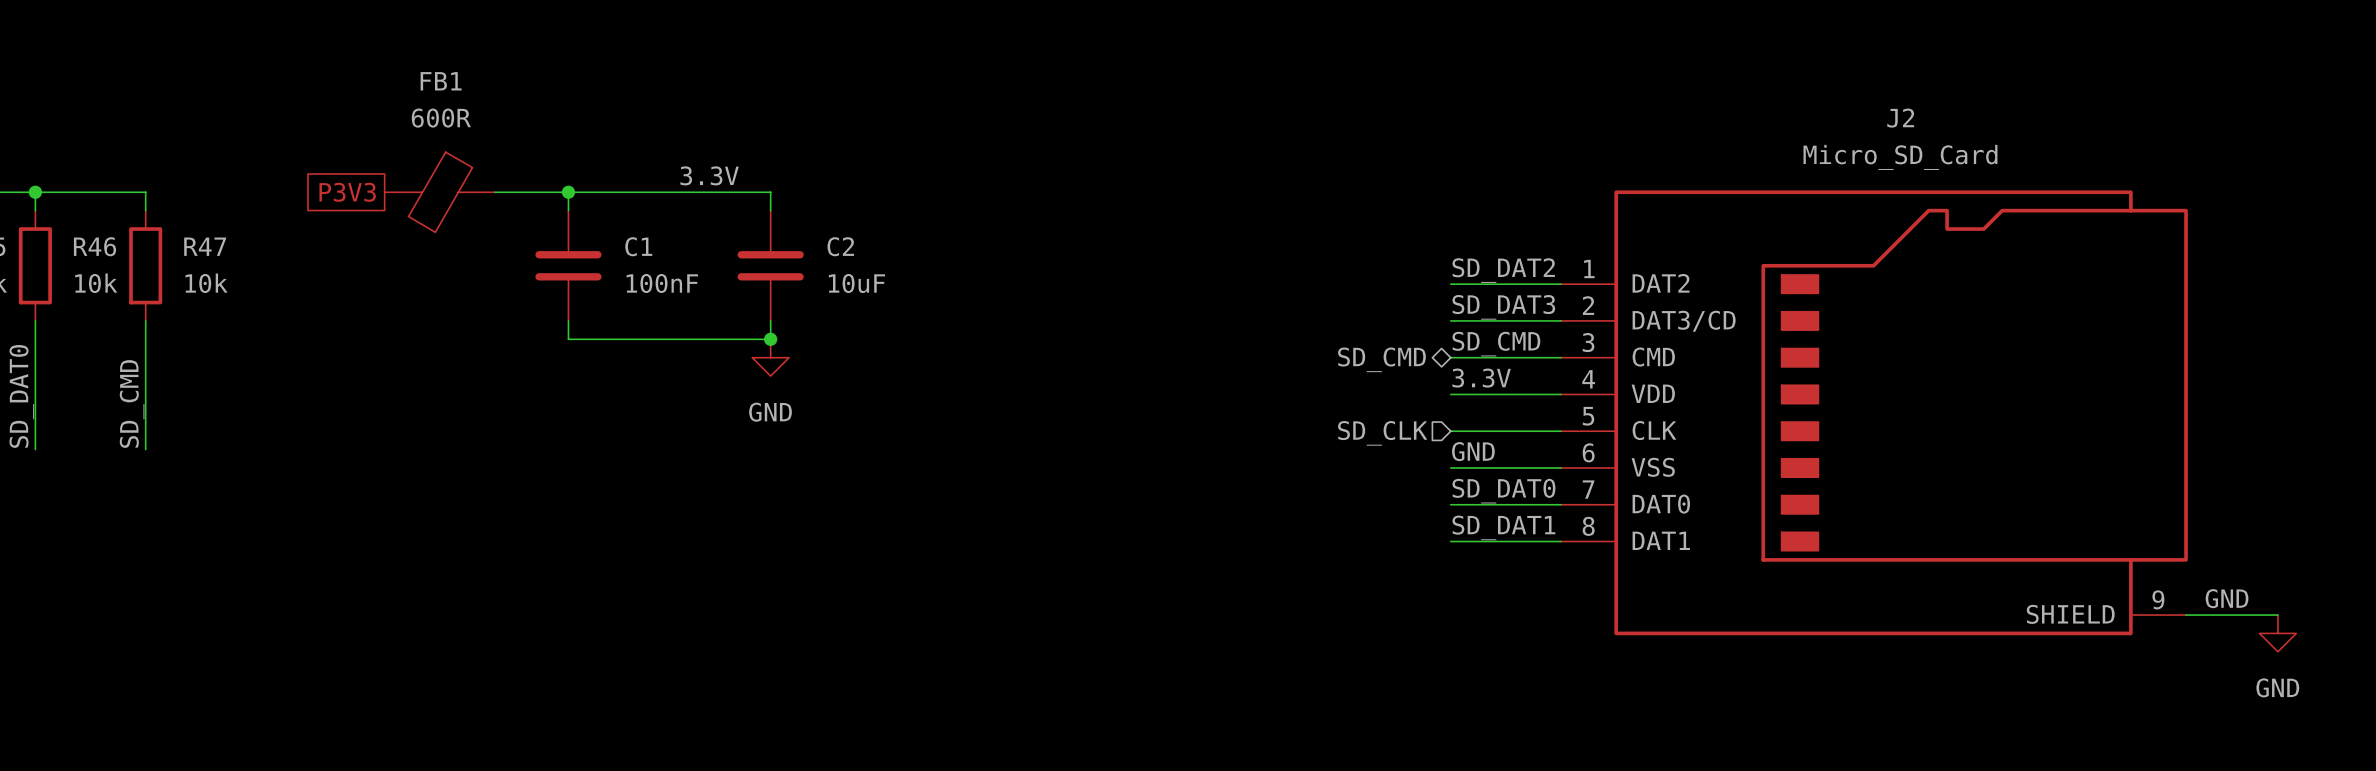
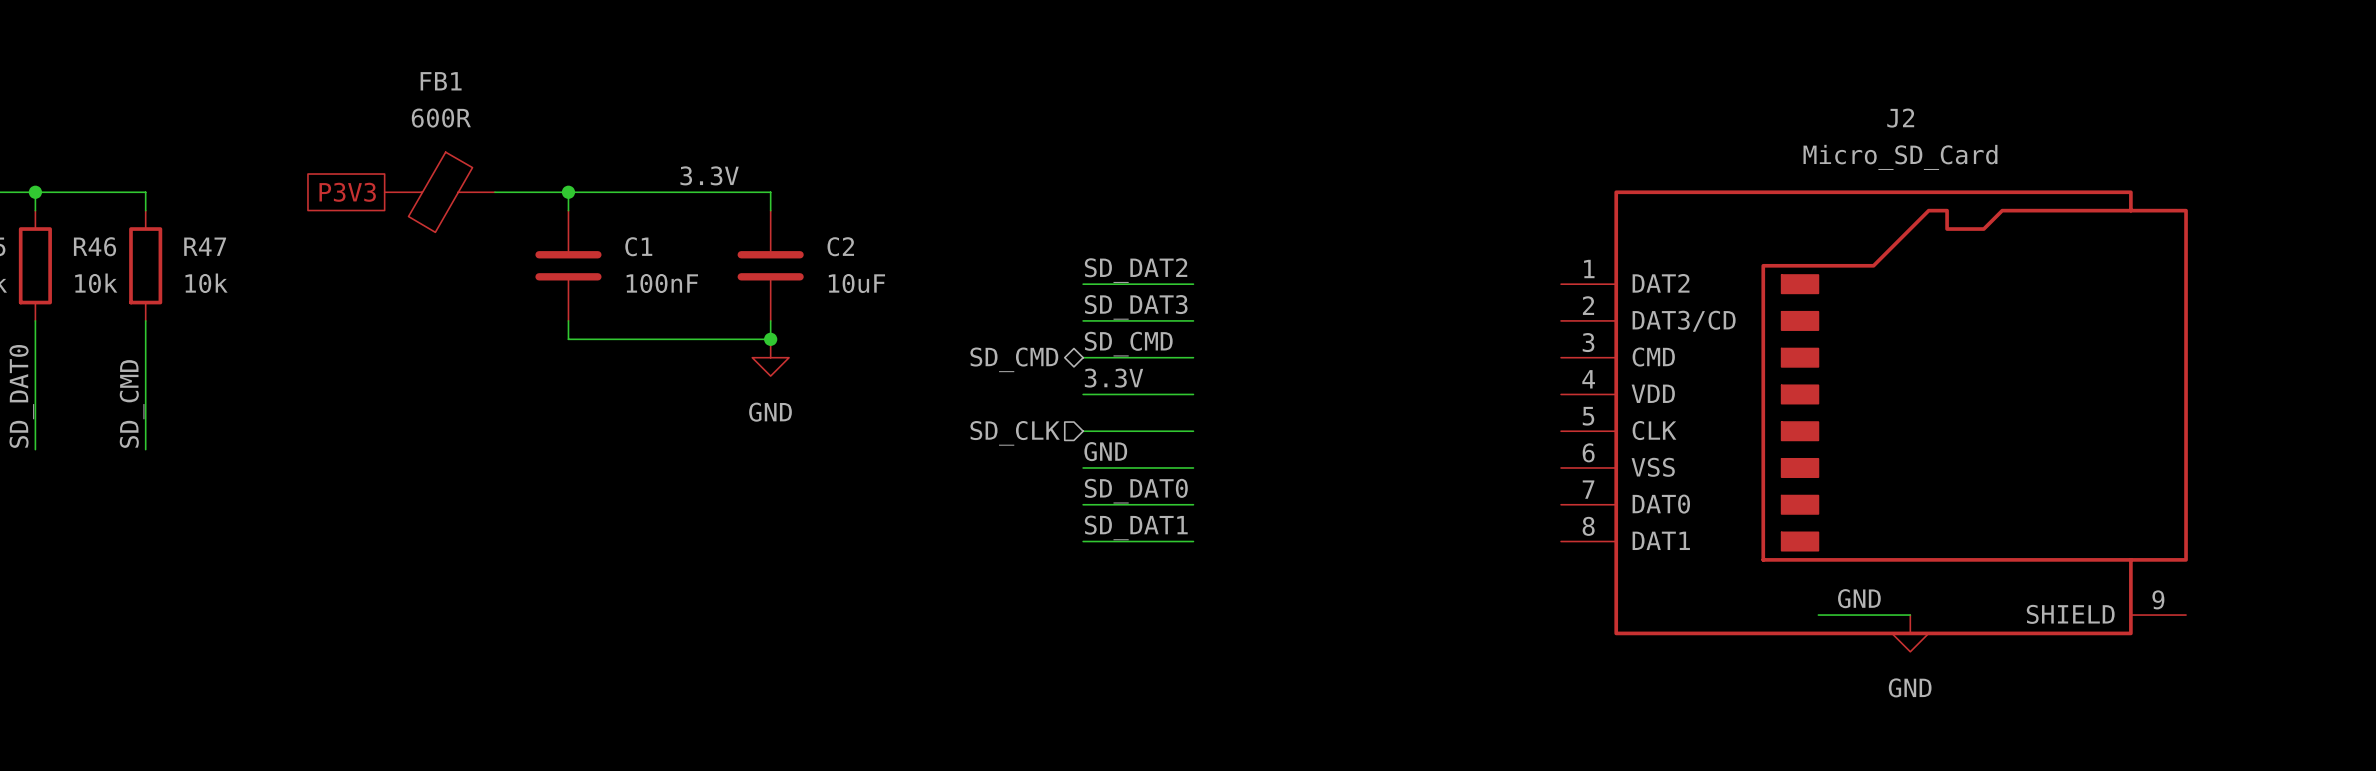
label: none -> SD_DAT2 (1136, 270)
label: SD_DAT2 (1503, 270) -> none
wire: none -> (1083, 284) (1193, 284)
wire: (1450, 284) (1561, 284) -> none
label: none -> SD_DAT3 (1136, 307)
label: SD_DAT3 (1503, 307) -> none
wire: none -> (1083, 320) (1193, 320)
wire: (1450, 320) (1561, 320) -> none
label: none -> SD_CMD (1128, 344)
label: SD_CMD (1496, 344) -> none
wire: none -> (1083, 357) (1193, 357)
wire: (1450, 357) (1561, 357) -> none
hierarchical label: none -> SD_CMD (1014, 359)
hierarchical label: SD_CMD (1381, 359) -> none
label: none -> 3.3V (1113, 378)
label: 3.3V (1481, 378) -> none
wire: none -> (1083, 394) (1193, 394)
wire: (1450, 394) (1561, 394) -> none
wire: none -> (1083, 431) (1193, 431)
wire: (1450, 431) (1561, 431) -> none
hierarchical label: none -> SD_CLK (1015, 433)
hierarchical label: SD_CLK (1382, 433) -> none
label: none -> GND (1105, 451)
label: GND (1473, 451) -> none
wire: none -> (1083, 467) (1193, 467)
wire: (1450, 467) (1561, 467) -> none
label: none -> SD_DAT0 (1136, 491)
label: SD_DAT0 (1503, 491) -> none
wire: none -> (1083, 504) (1193, 504)
wire: (1450, 504) (1561, 504) -> none
label: none -> SD_DAT1 (1136, 527)
label: SD_DAT1 (1503, 527) -> none
wire: none -> (1083, 541) (1193, 541)
wire: (1450, 541) (1561, 541) -> none
label: none -> GND (1859, 598)
label: GND (2227, 598) -> none
wire: none -> (1818, 615) (1910, 615)
wire: (2186, 615) (2277, 615) -> none
power symbol: none -> GND (1910, 633)
power symbol: GND (2277, 633) -> none

